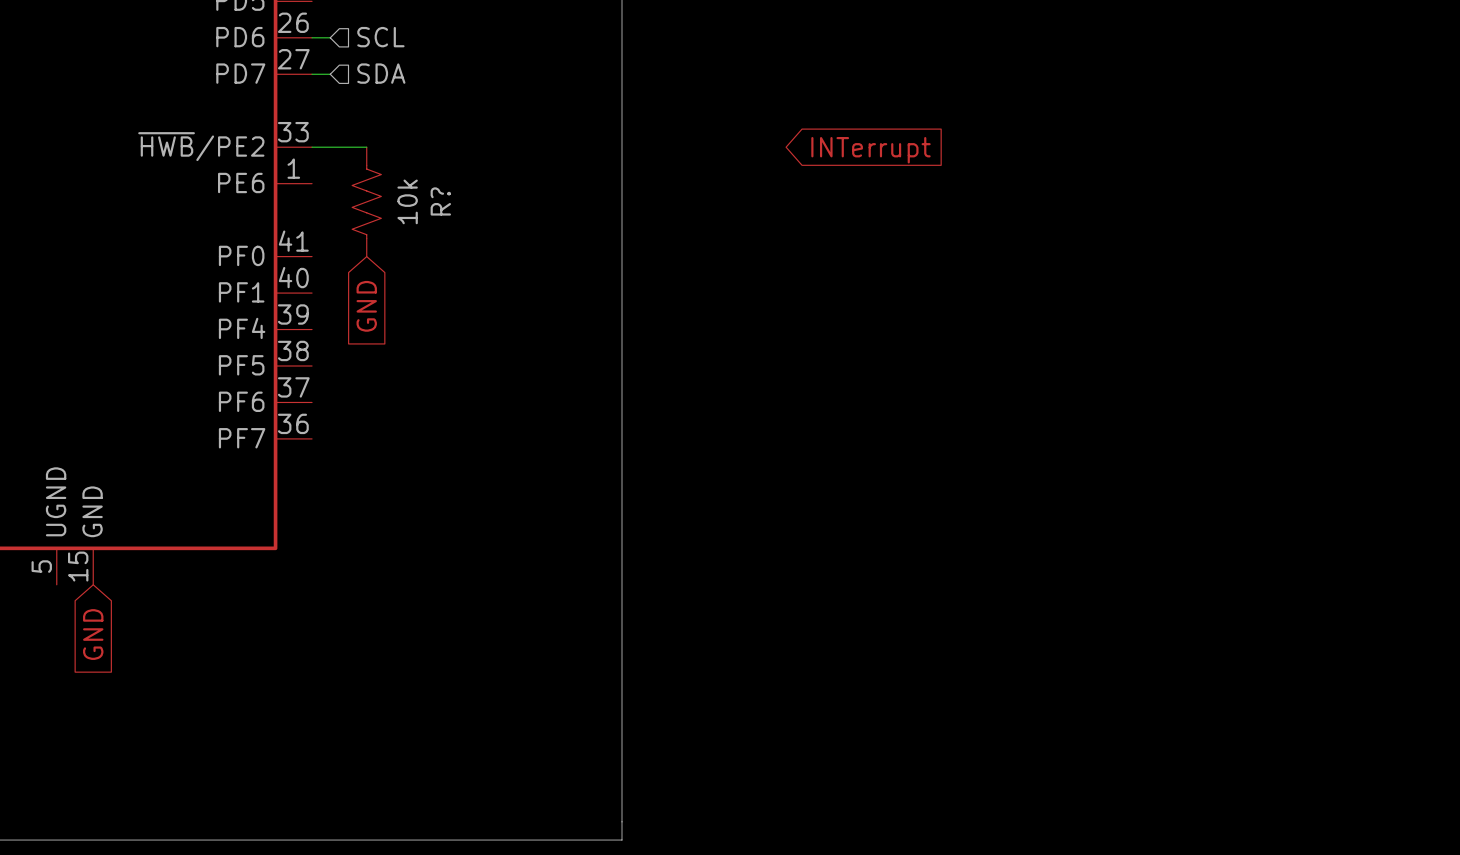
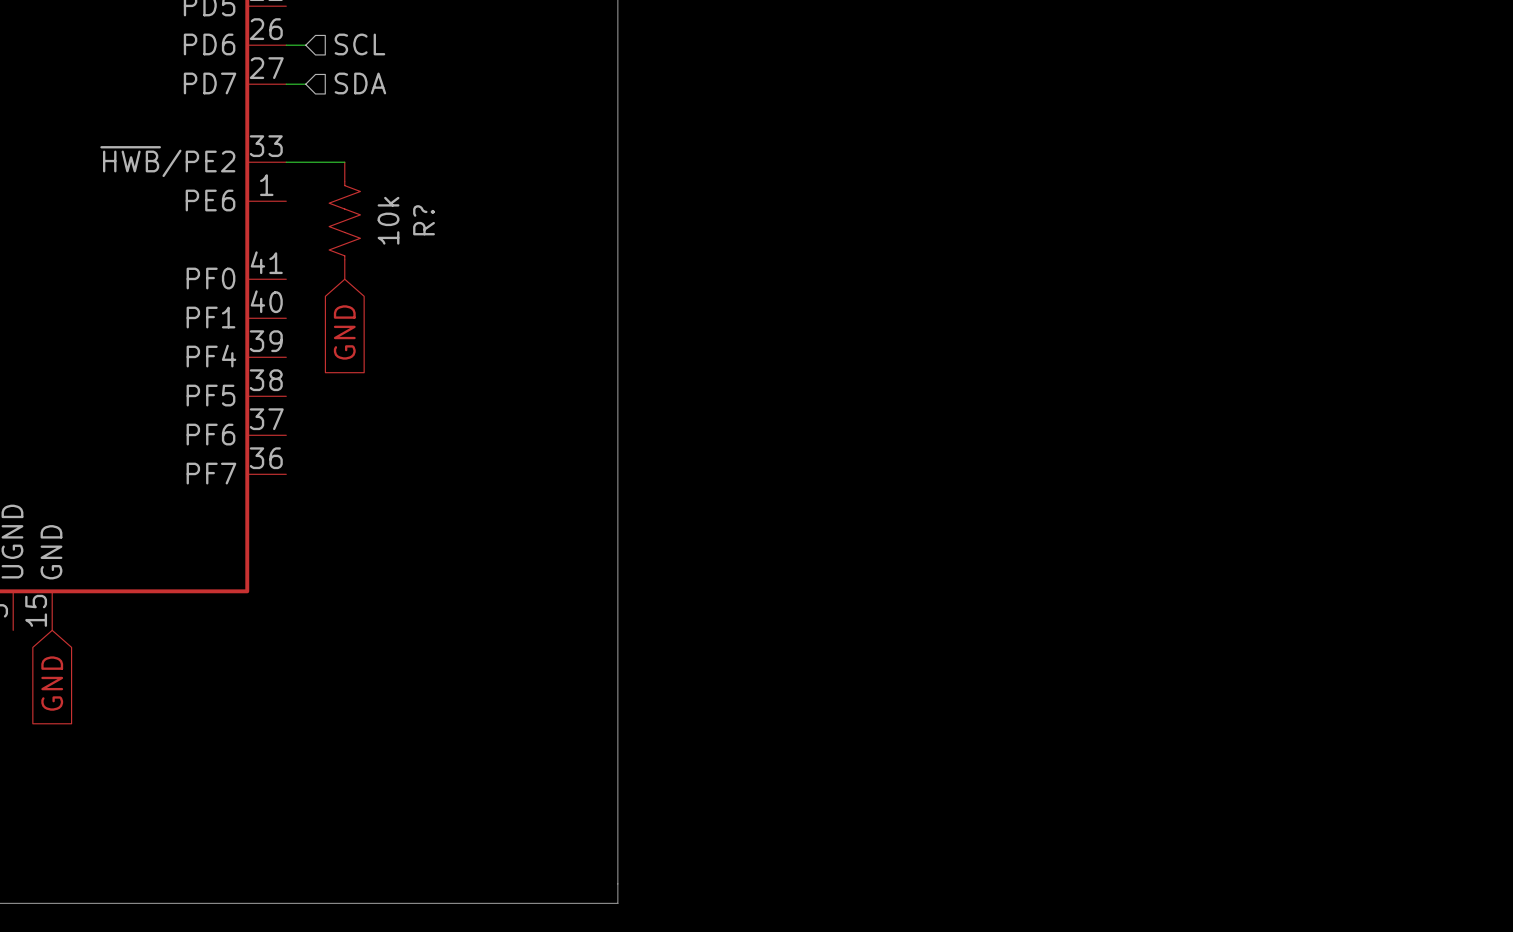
global label: INTerrupt (870, 150) -> none

